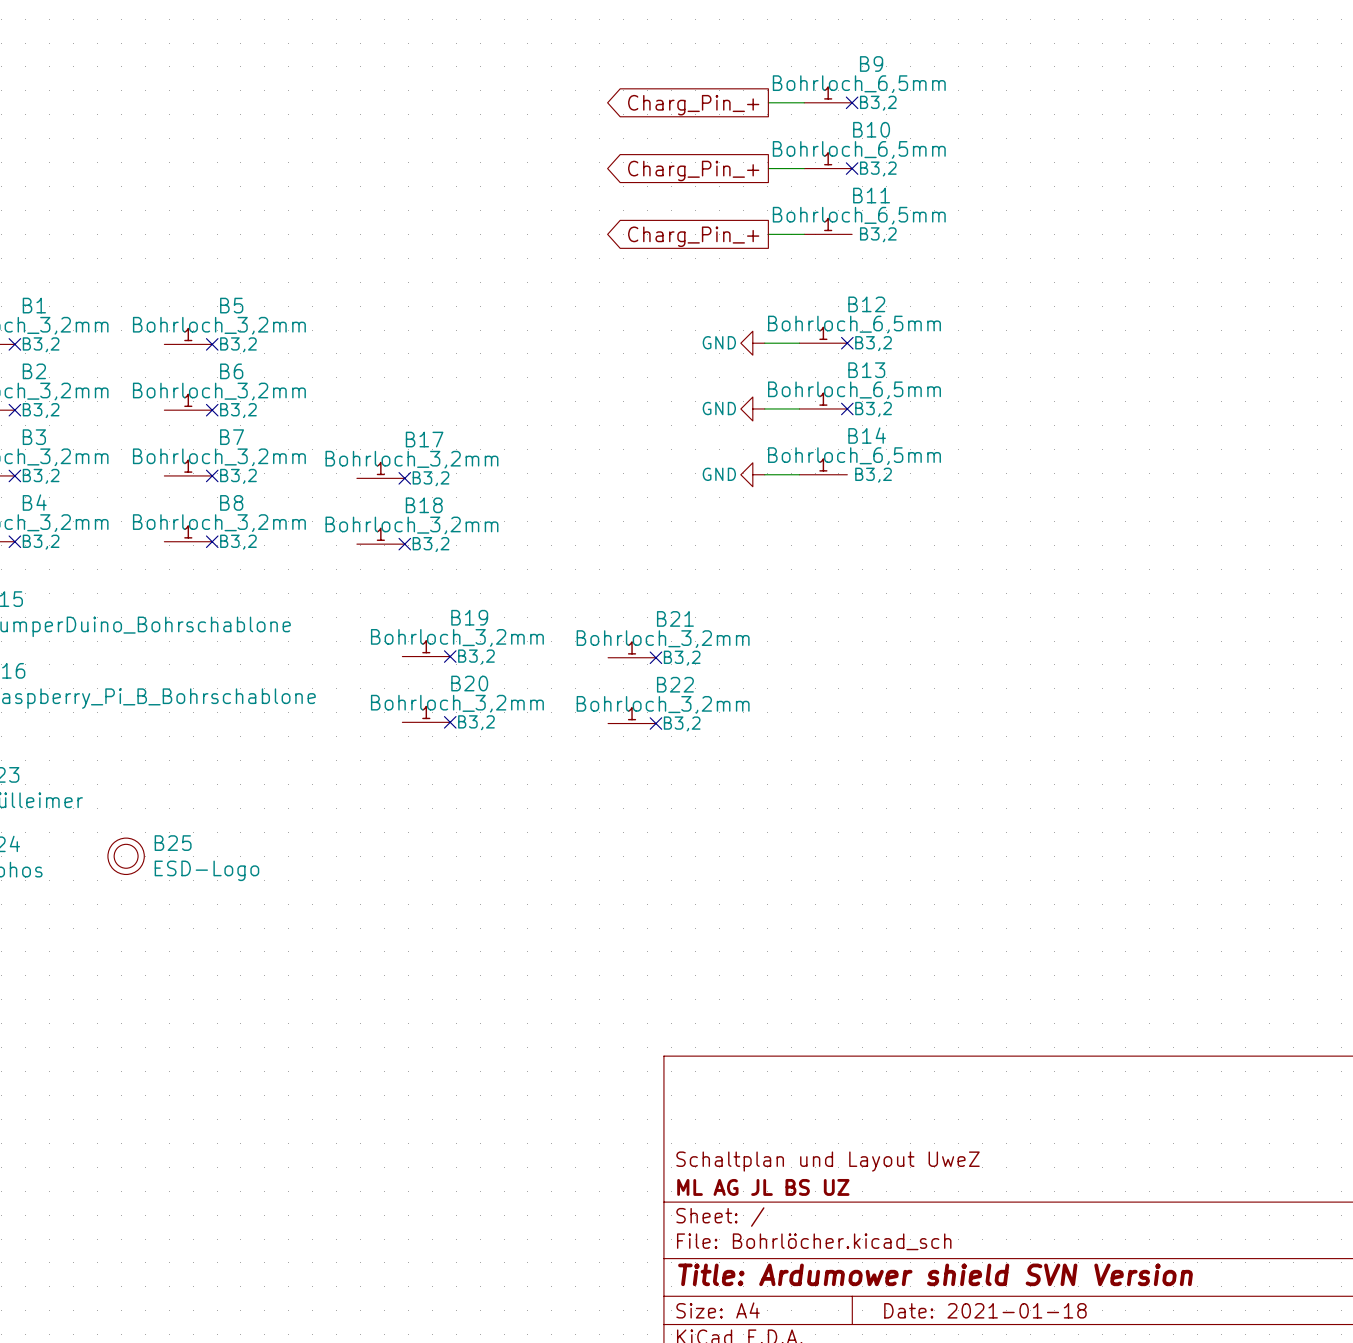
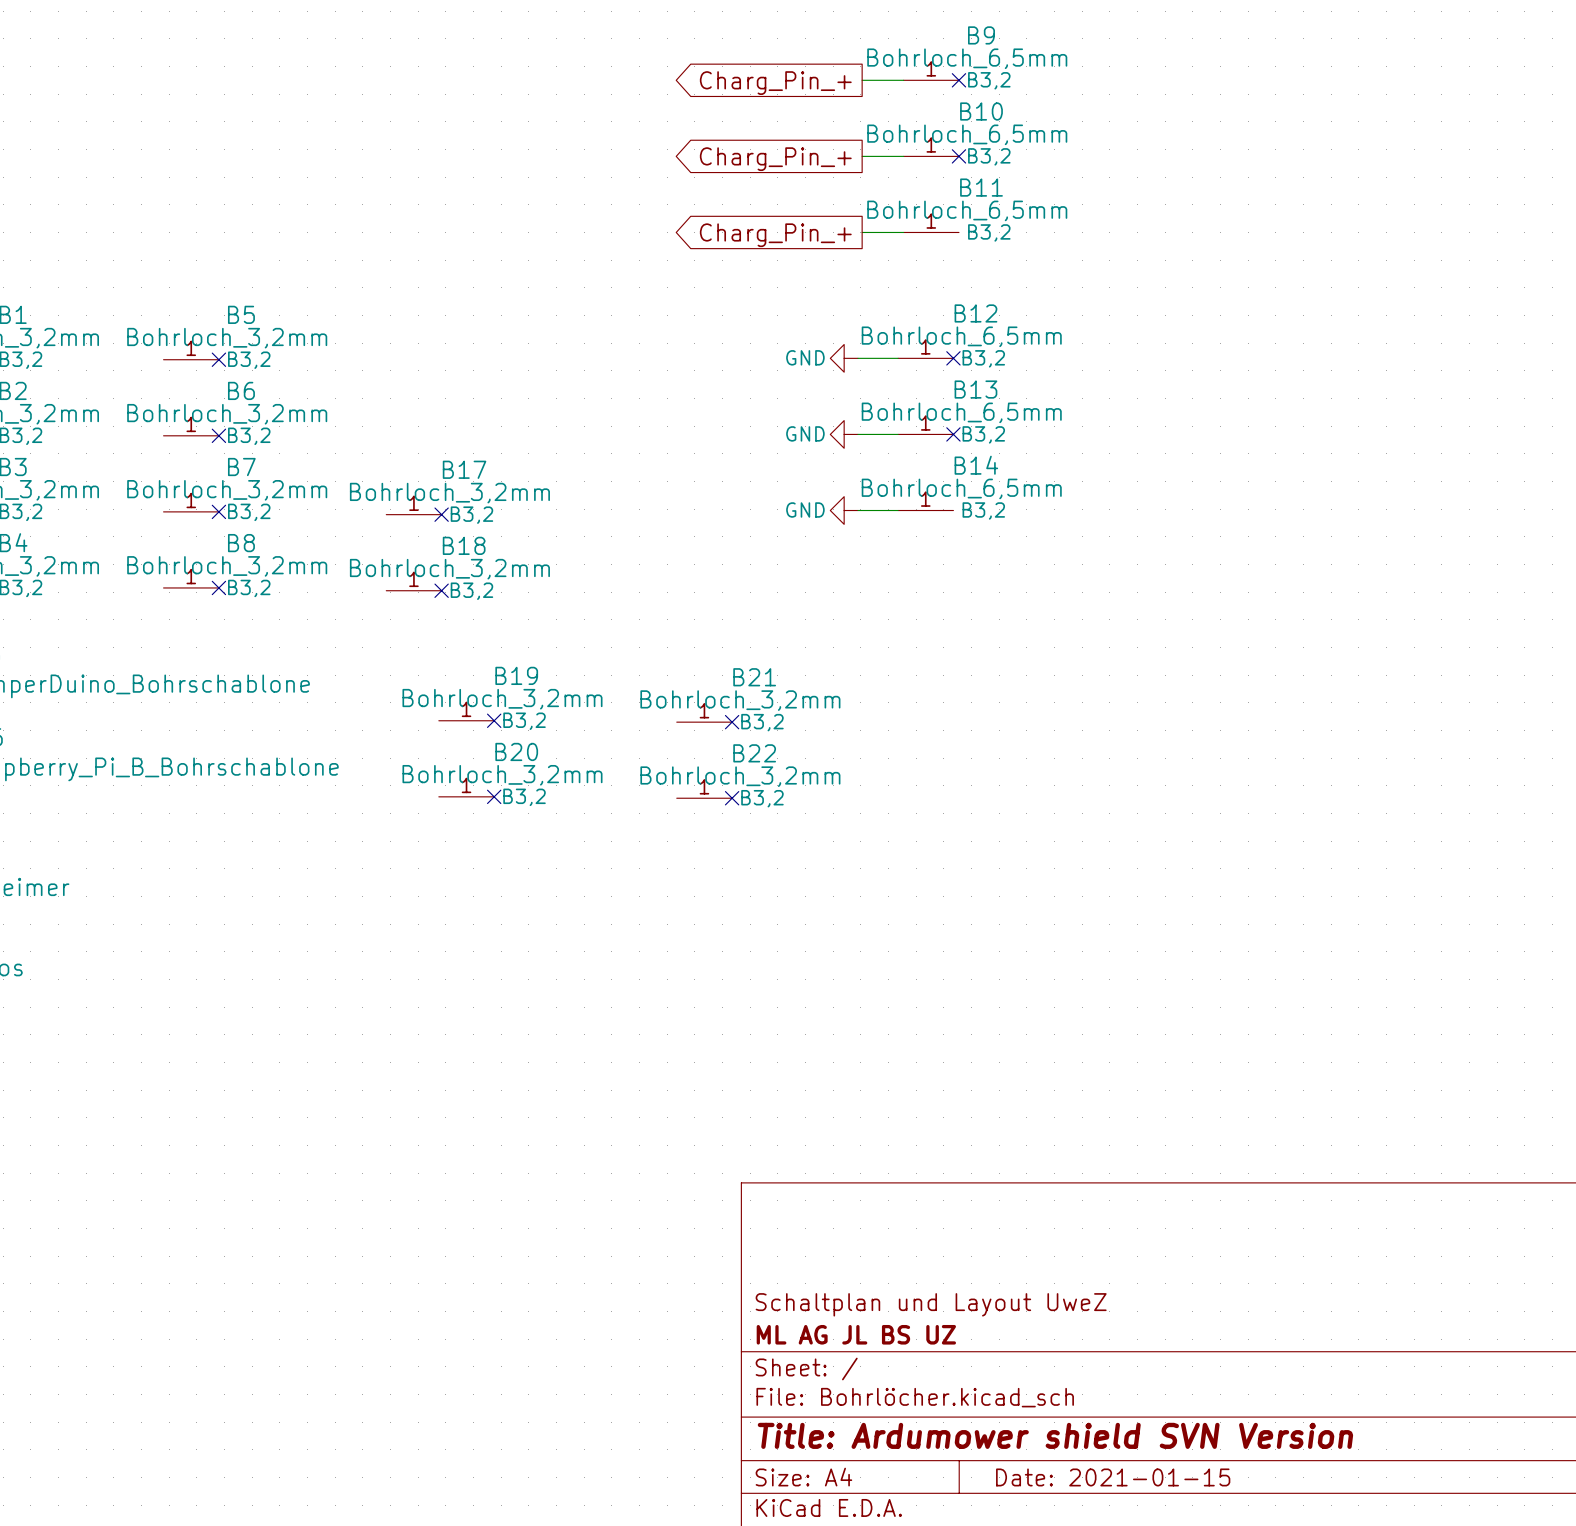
B25: ESD-Logo (126, 856) -> none
title block: Date: 2021-01-18 (985, 1310) -> Date: 2021-01-15 (1113, 1477)

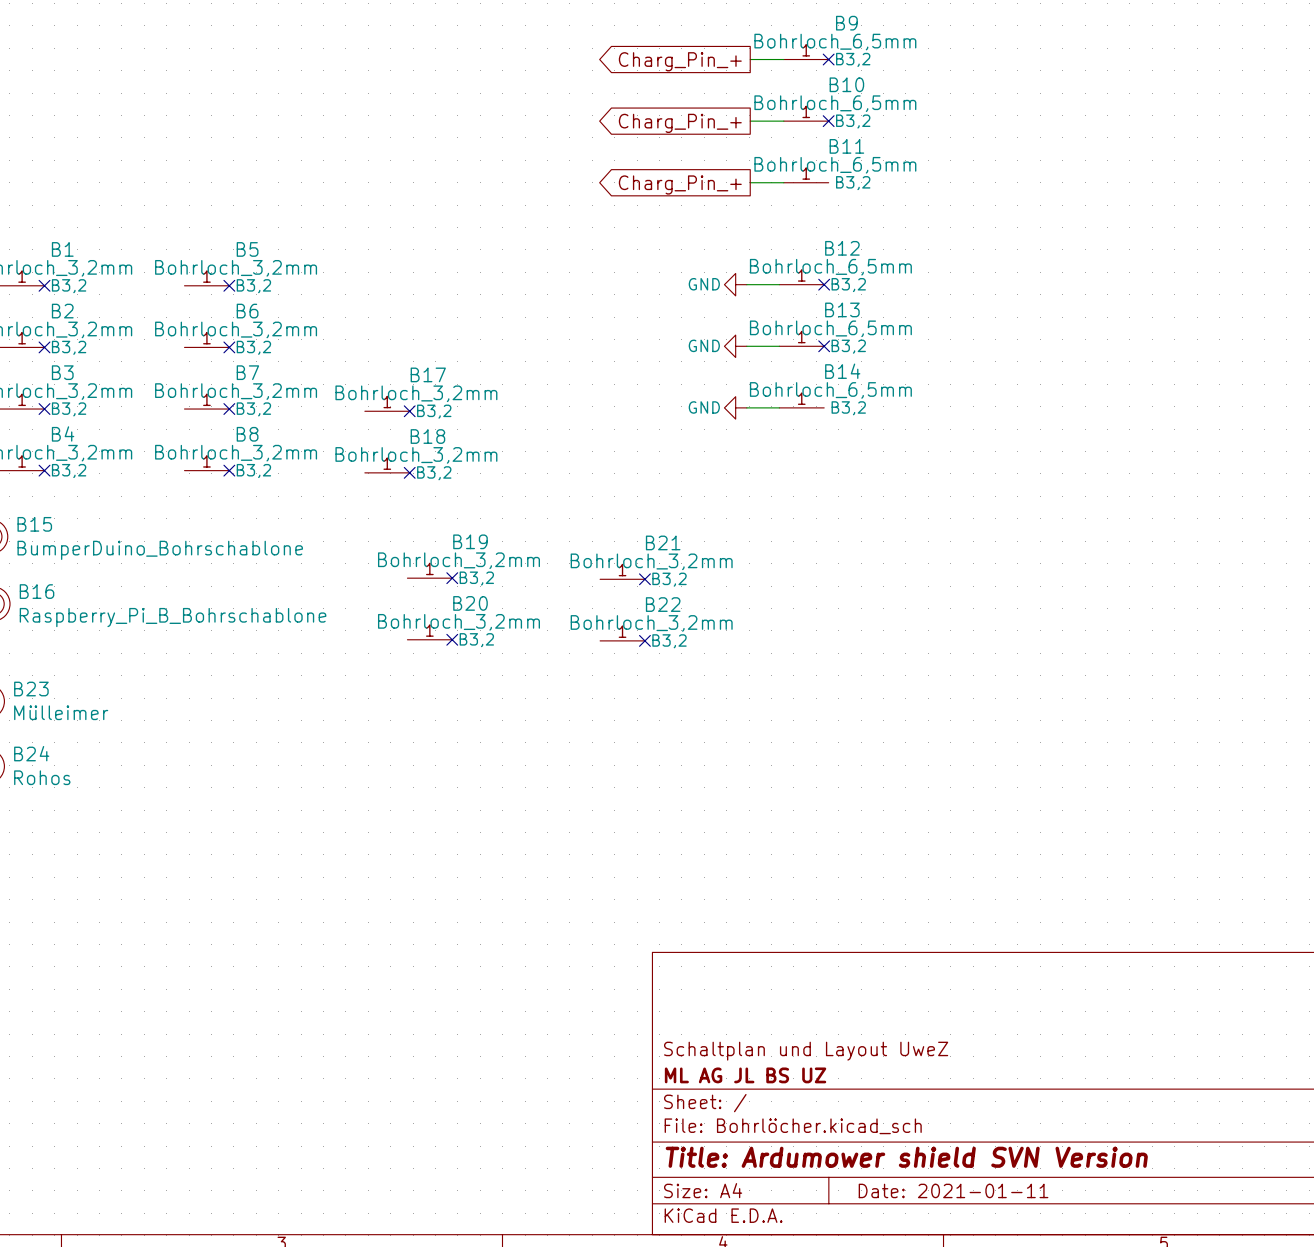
title block: Date: 2021-01-15 (1113, 1477) -> Date: 2021-01-11 (953, 1190)

